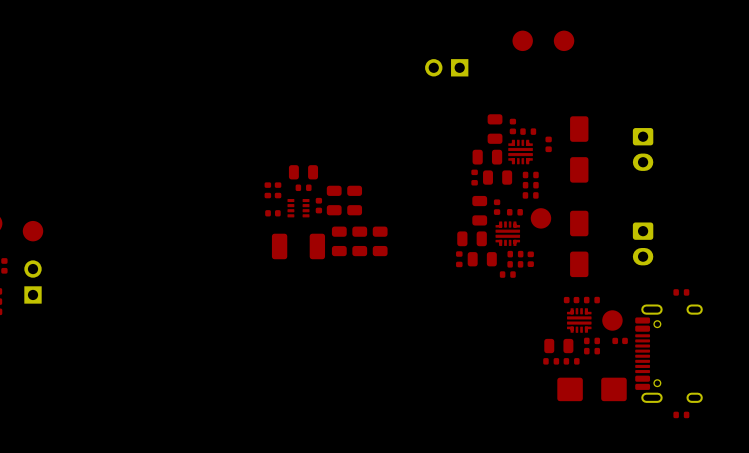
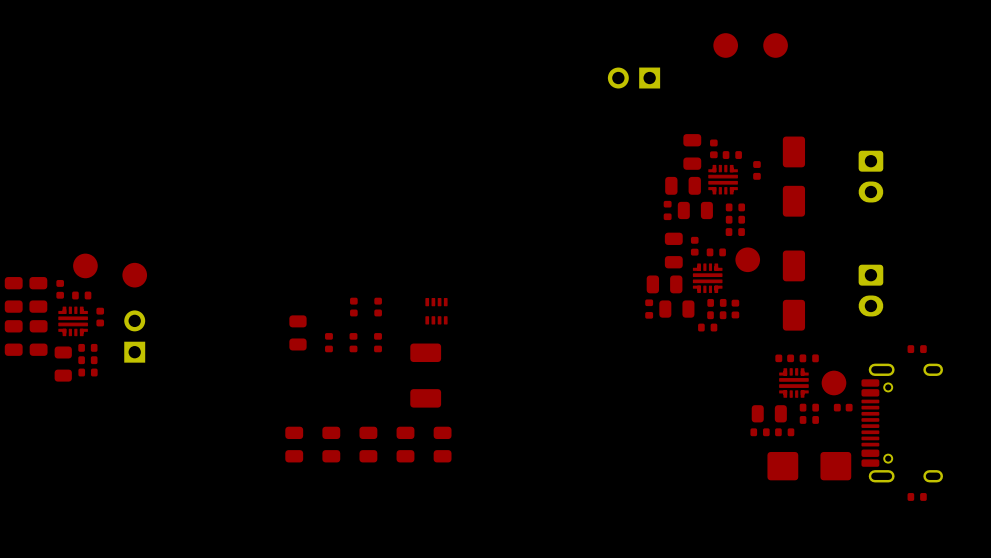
part rotation: 0° (303, 172) -> 90° clockwise (297, 332)
part position: (303, 172) -> (297, 332)
part: (303, 187) -> none
part: (267, 190) -> none
part: (278, 190) -> none
part: (334, 200) -> none
part: (354, 200) -> none
part: (318, 205) -> none
part rotation: 0° (298, 208) -> 90° clockwise (436, 311)
part position: (298, 208) -> (436, 311)
part: (272, 213) -> none
part: (339, 241) -> none
part: (359, 241) -> none
part: (380, 241) -> none
part rotation: 0° (298, 246) -> 90° clockwise (425, 375)
part position: (298, 246) -> (425, 375)
part: none -> (353, 307)
part: none -> (378, 307)
part: none -> (328, 342)
part: none -> (353, 342)
part: none -> (378, 342)
part: none -> (294, 444)
part: none -> (331, 444)
part: none -> (368, 444)
part: none -> (405, 444)
part: none -> (442, 444)

